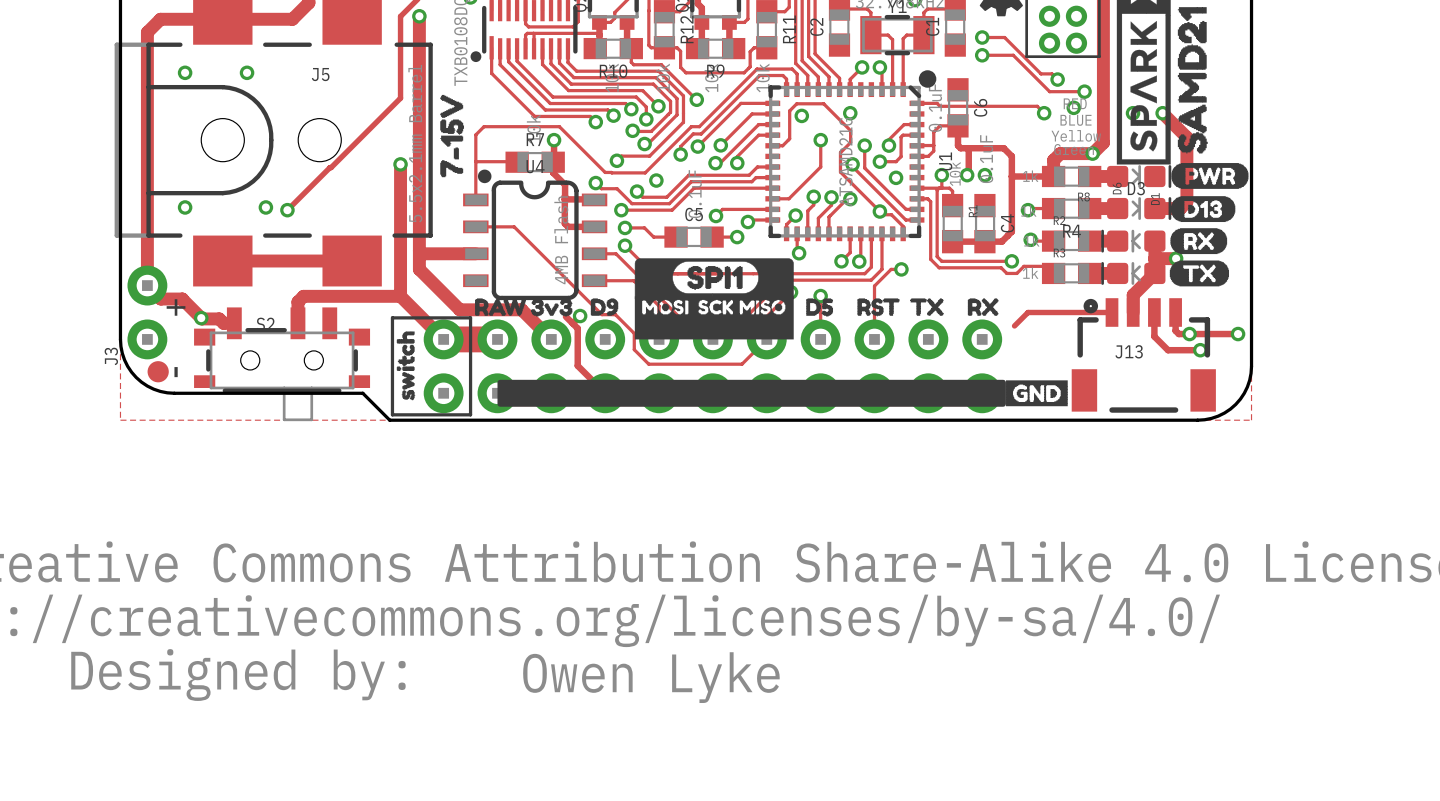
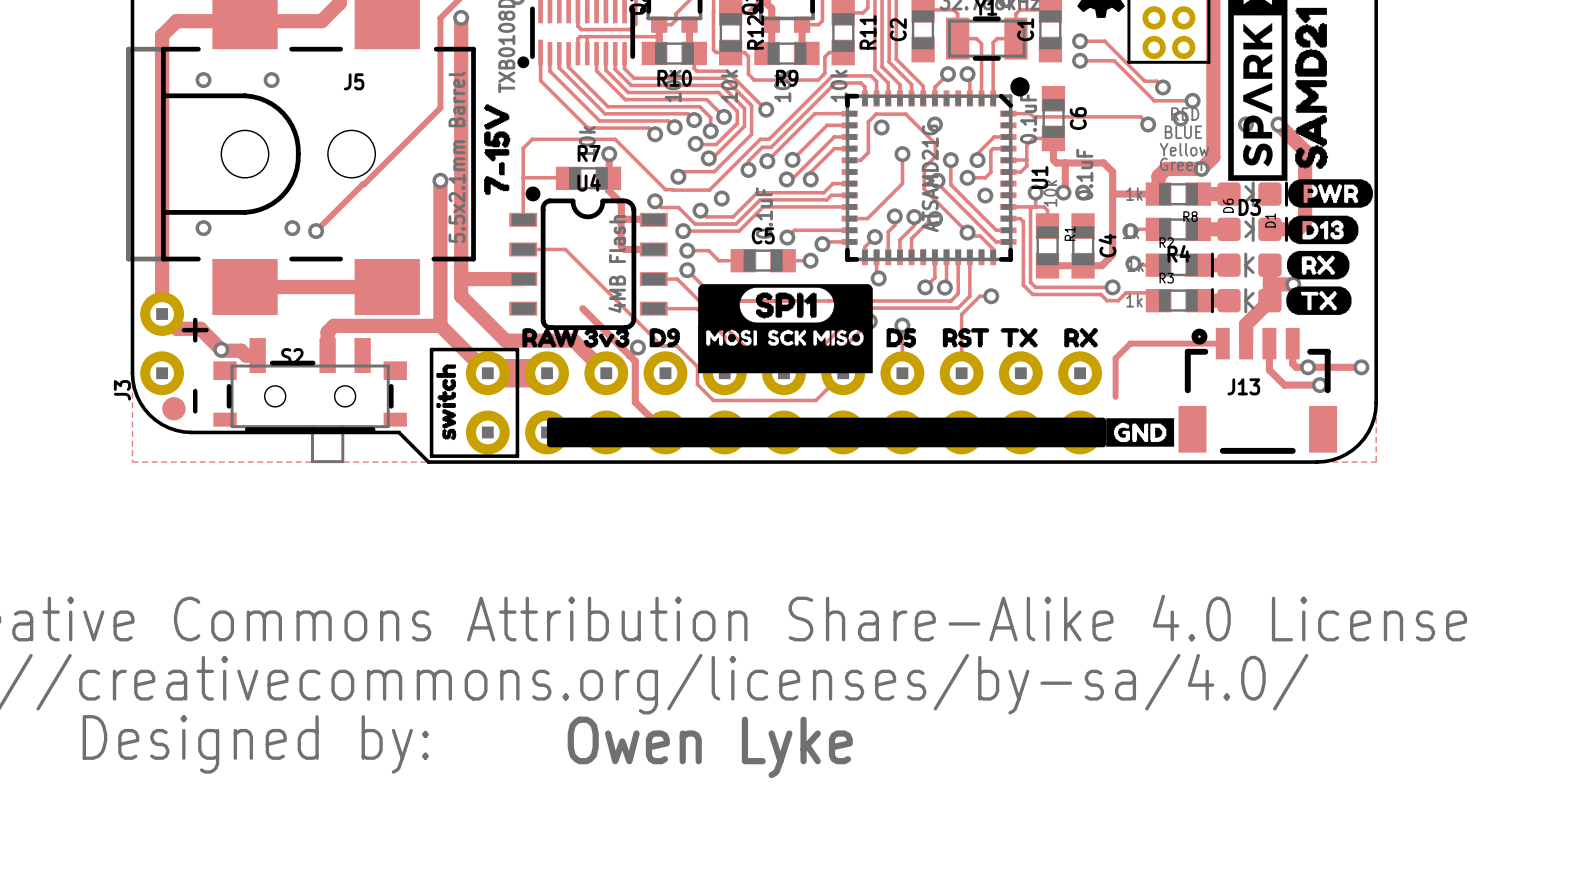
track: none -> (582, 308) (622, 348)
track: none -> (1115, 358) (1115, 396)

